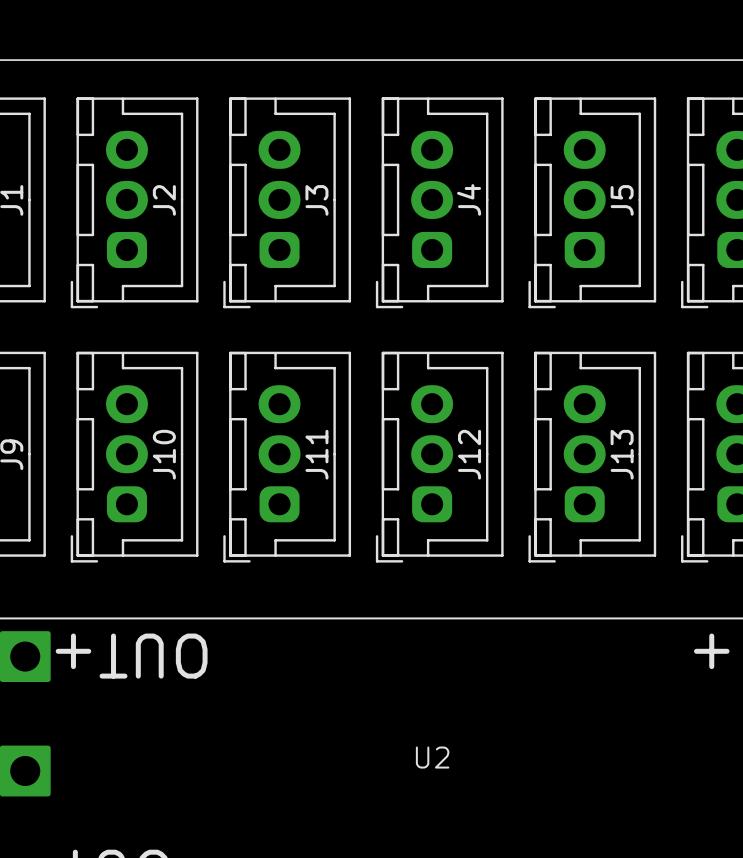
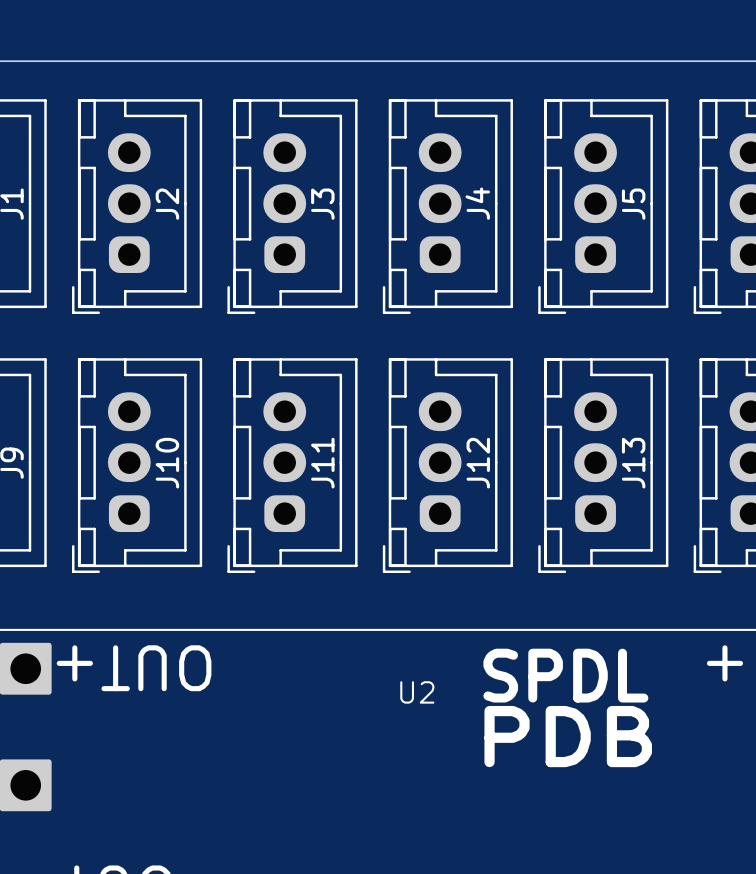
text: none -> SPDL (565, 675)
text: none -> PDB (568, 736)
U2 name position: U2 (432, 757) -> U2 (417, 692)

